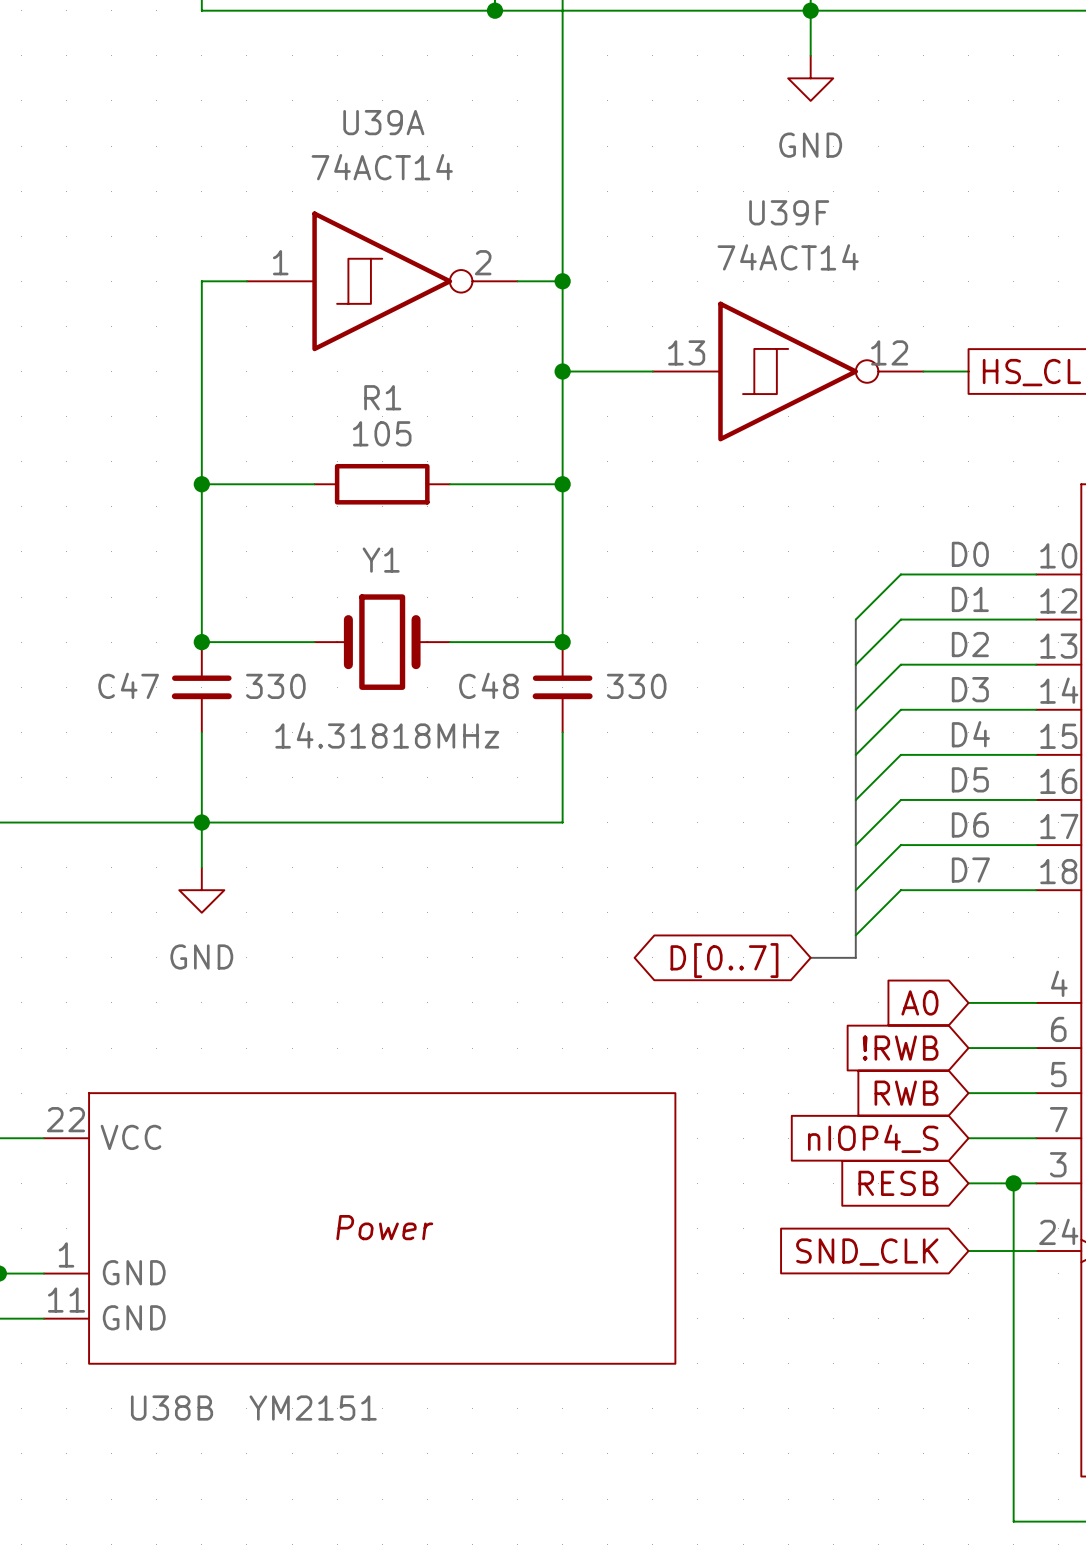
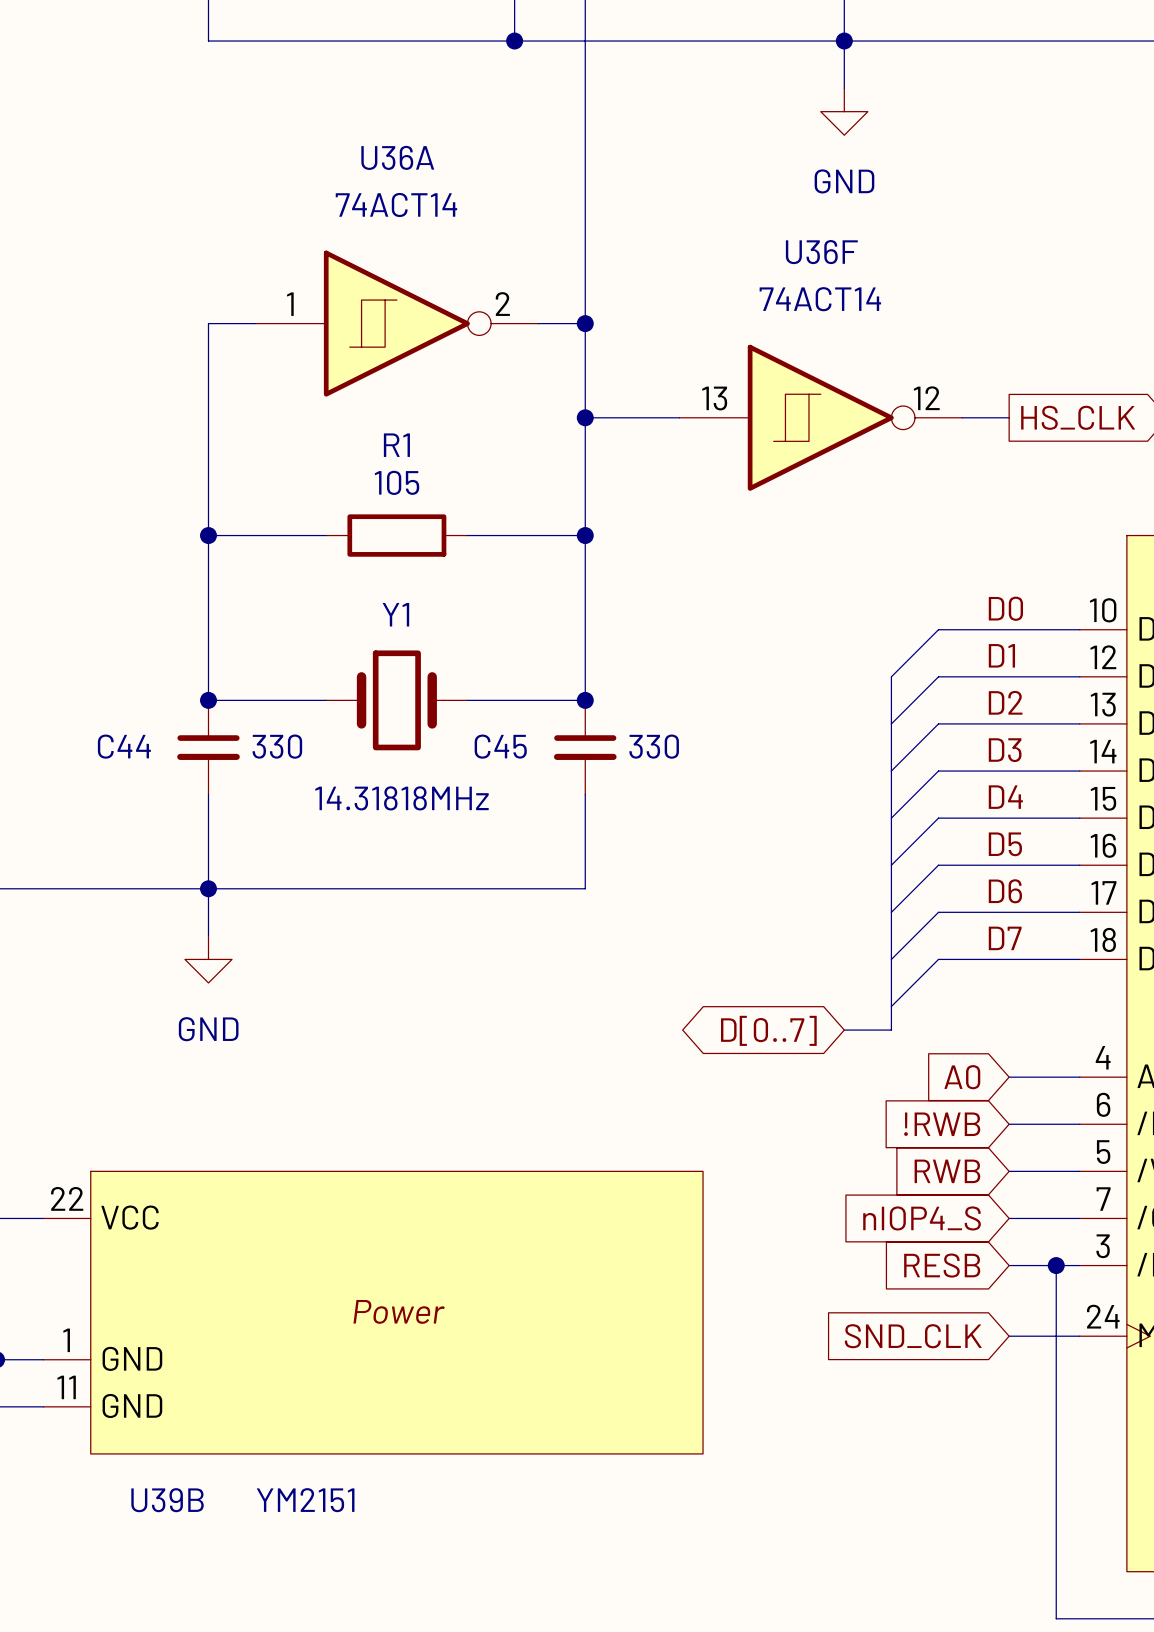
U39A name: U39A (383, 122) -> U36A (397, 157)
U39F name: U39F (789, 212) -> U36F (821, 252)
C47 name: C47 (128, 685) -> C44 (124, 746)
C48 name: C48 (488, 685) -> C45 (500, 746)
U38B name: U38B (172, 1408) -> U39B (167, 1500)

